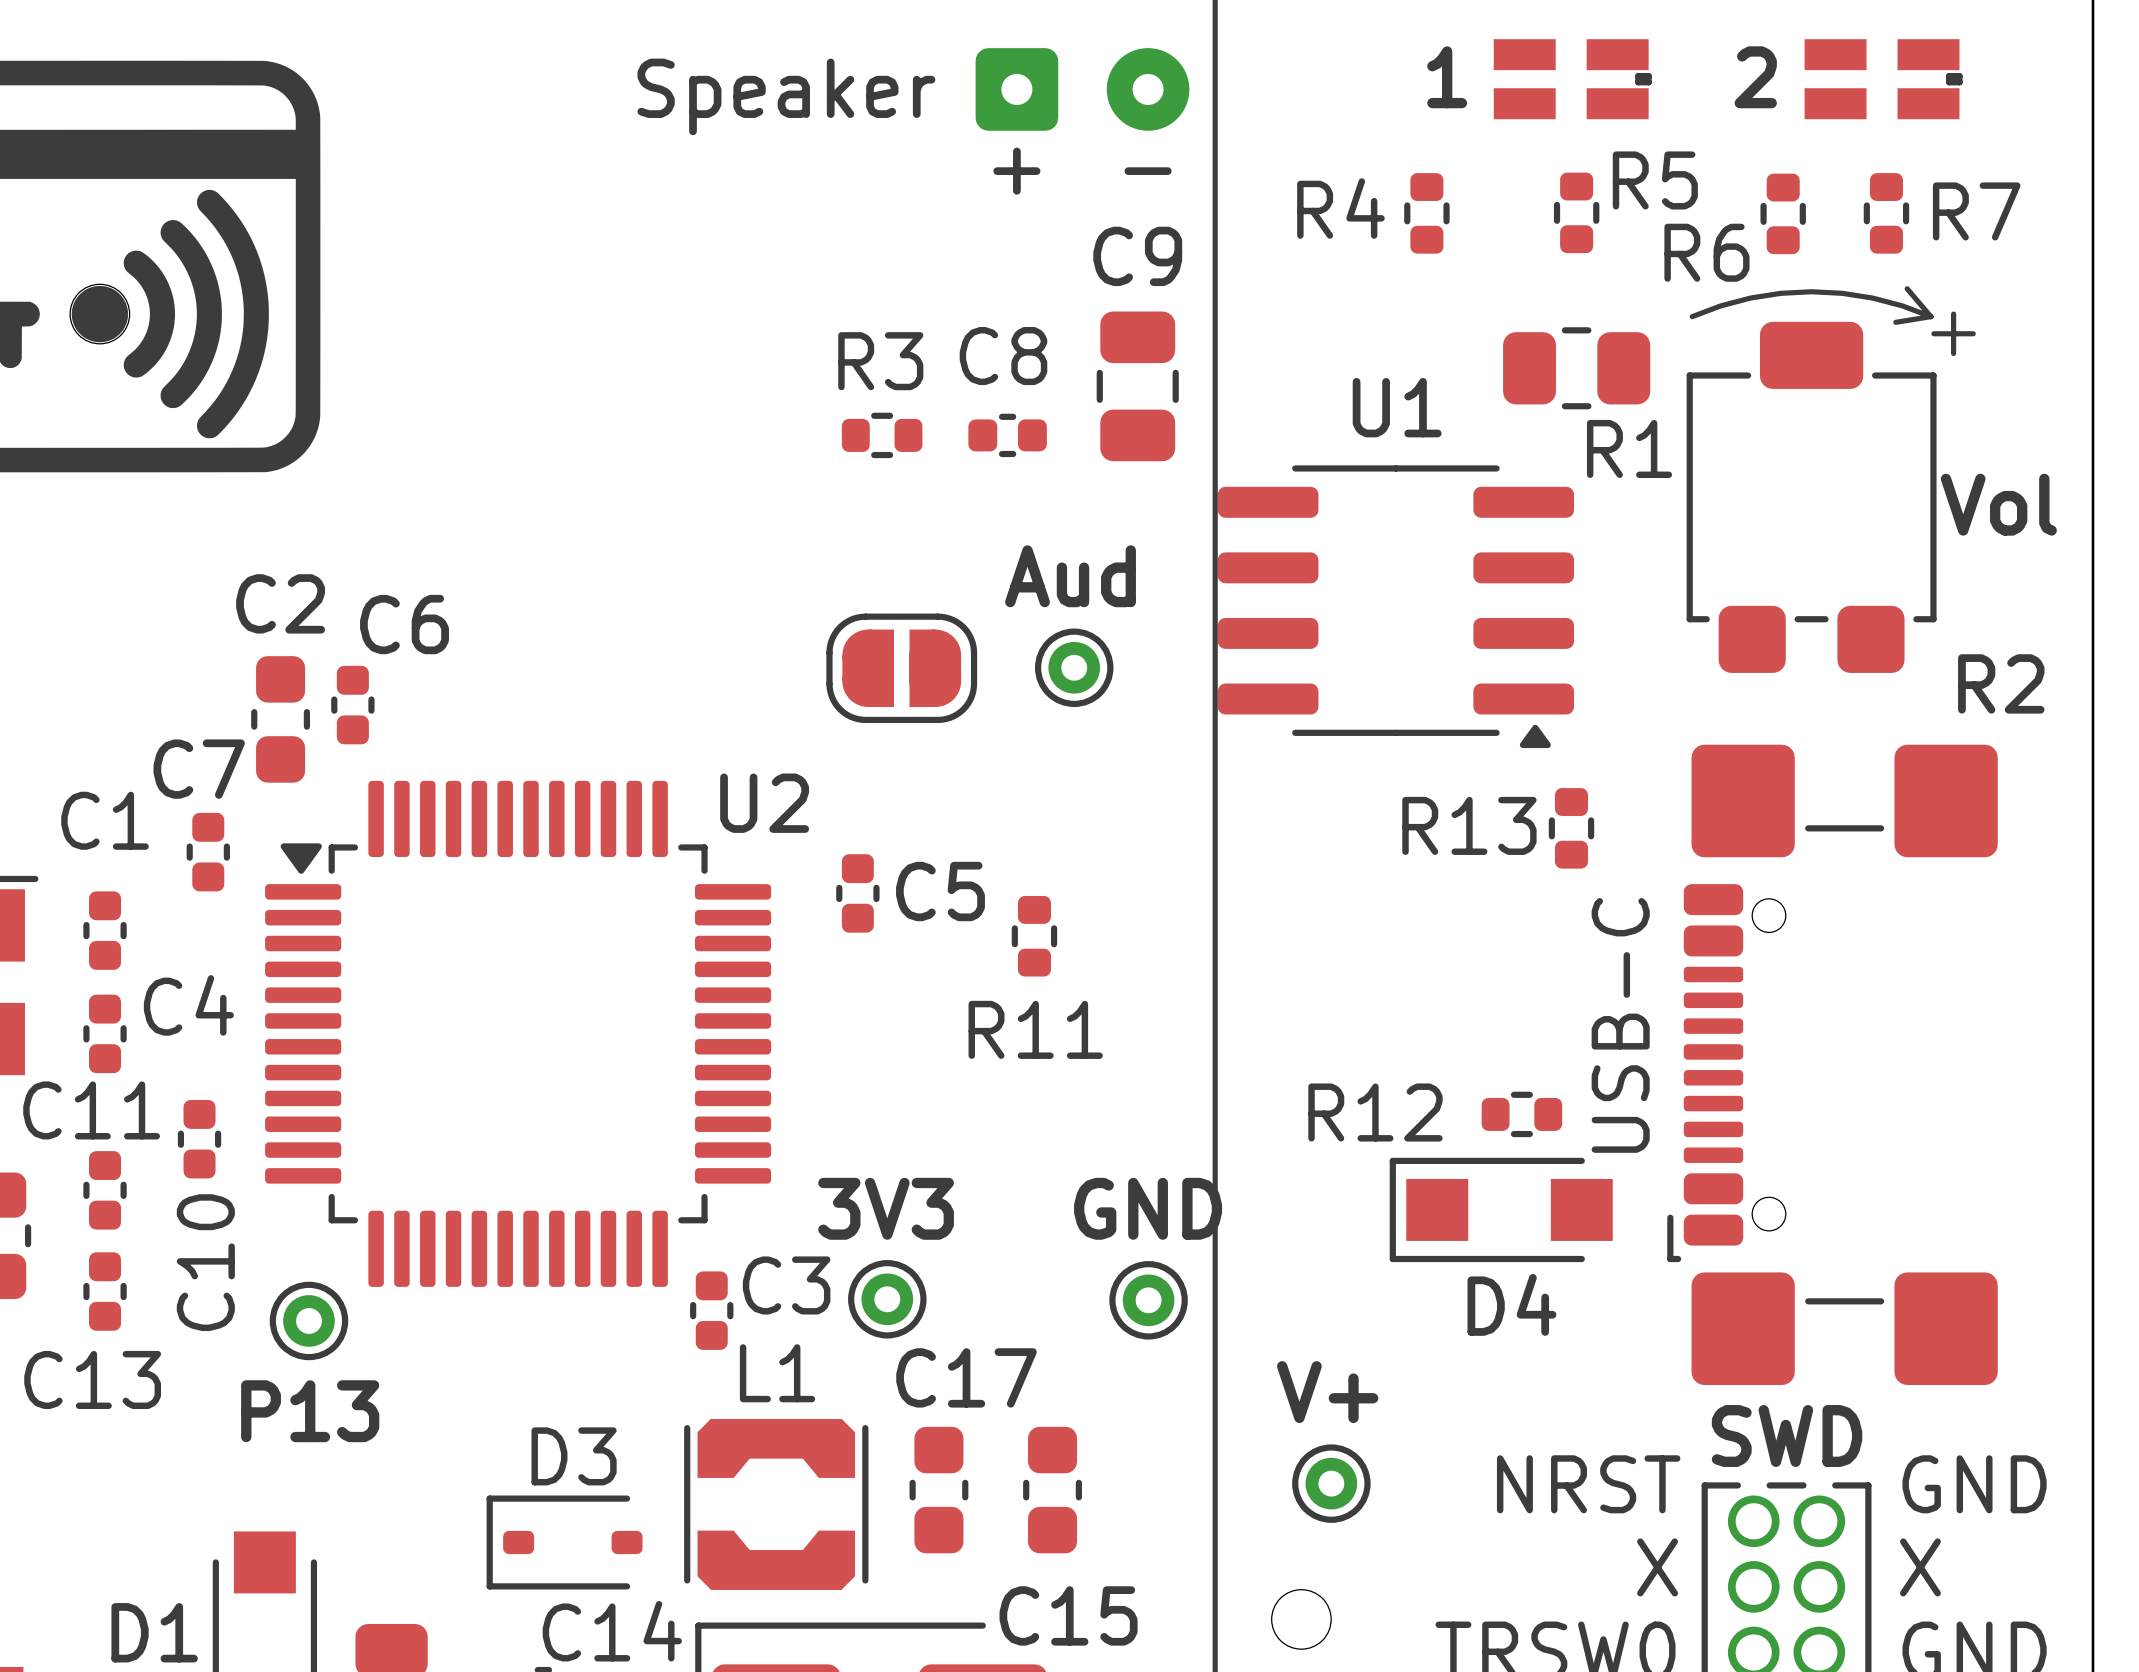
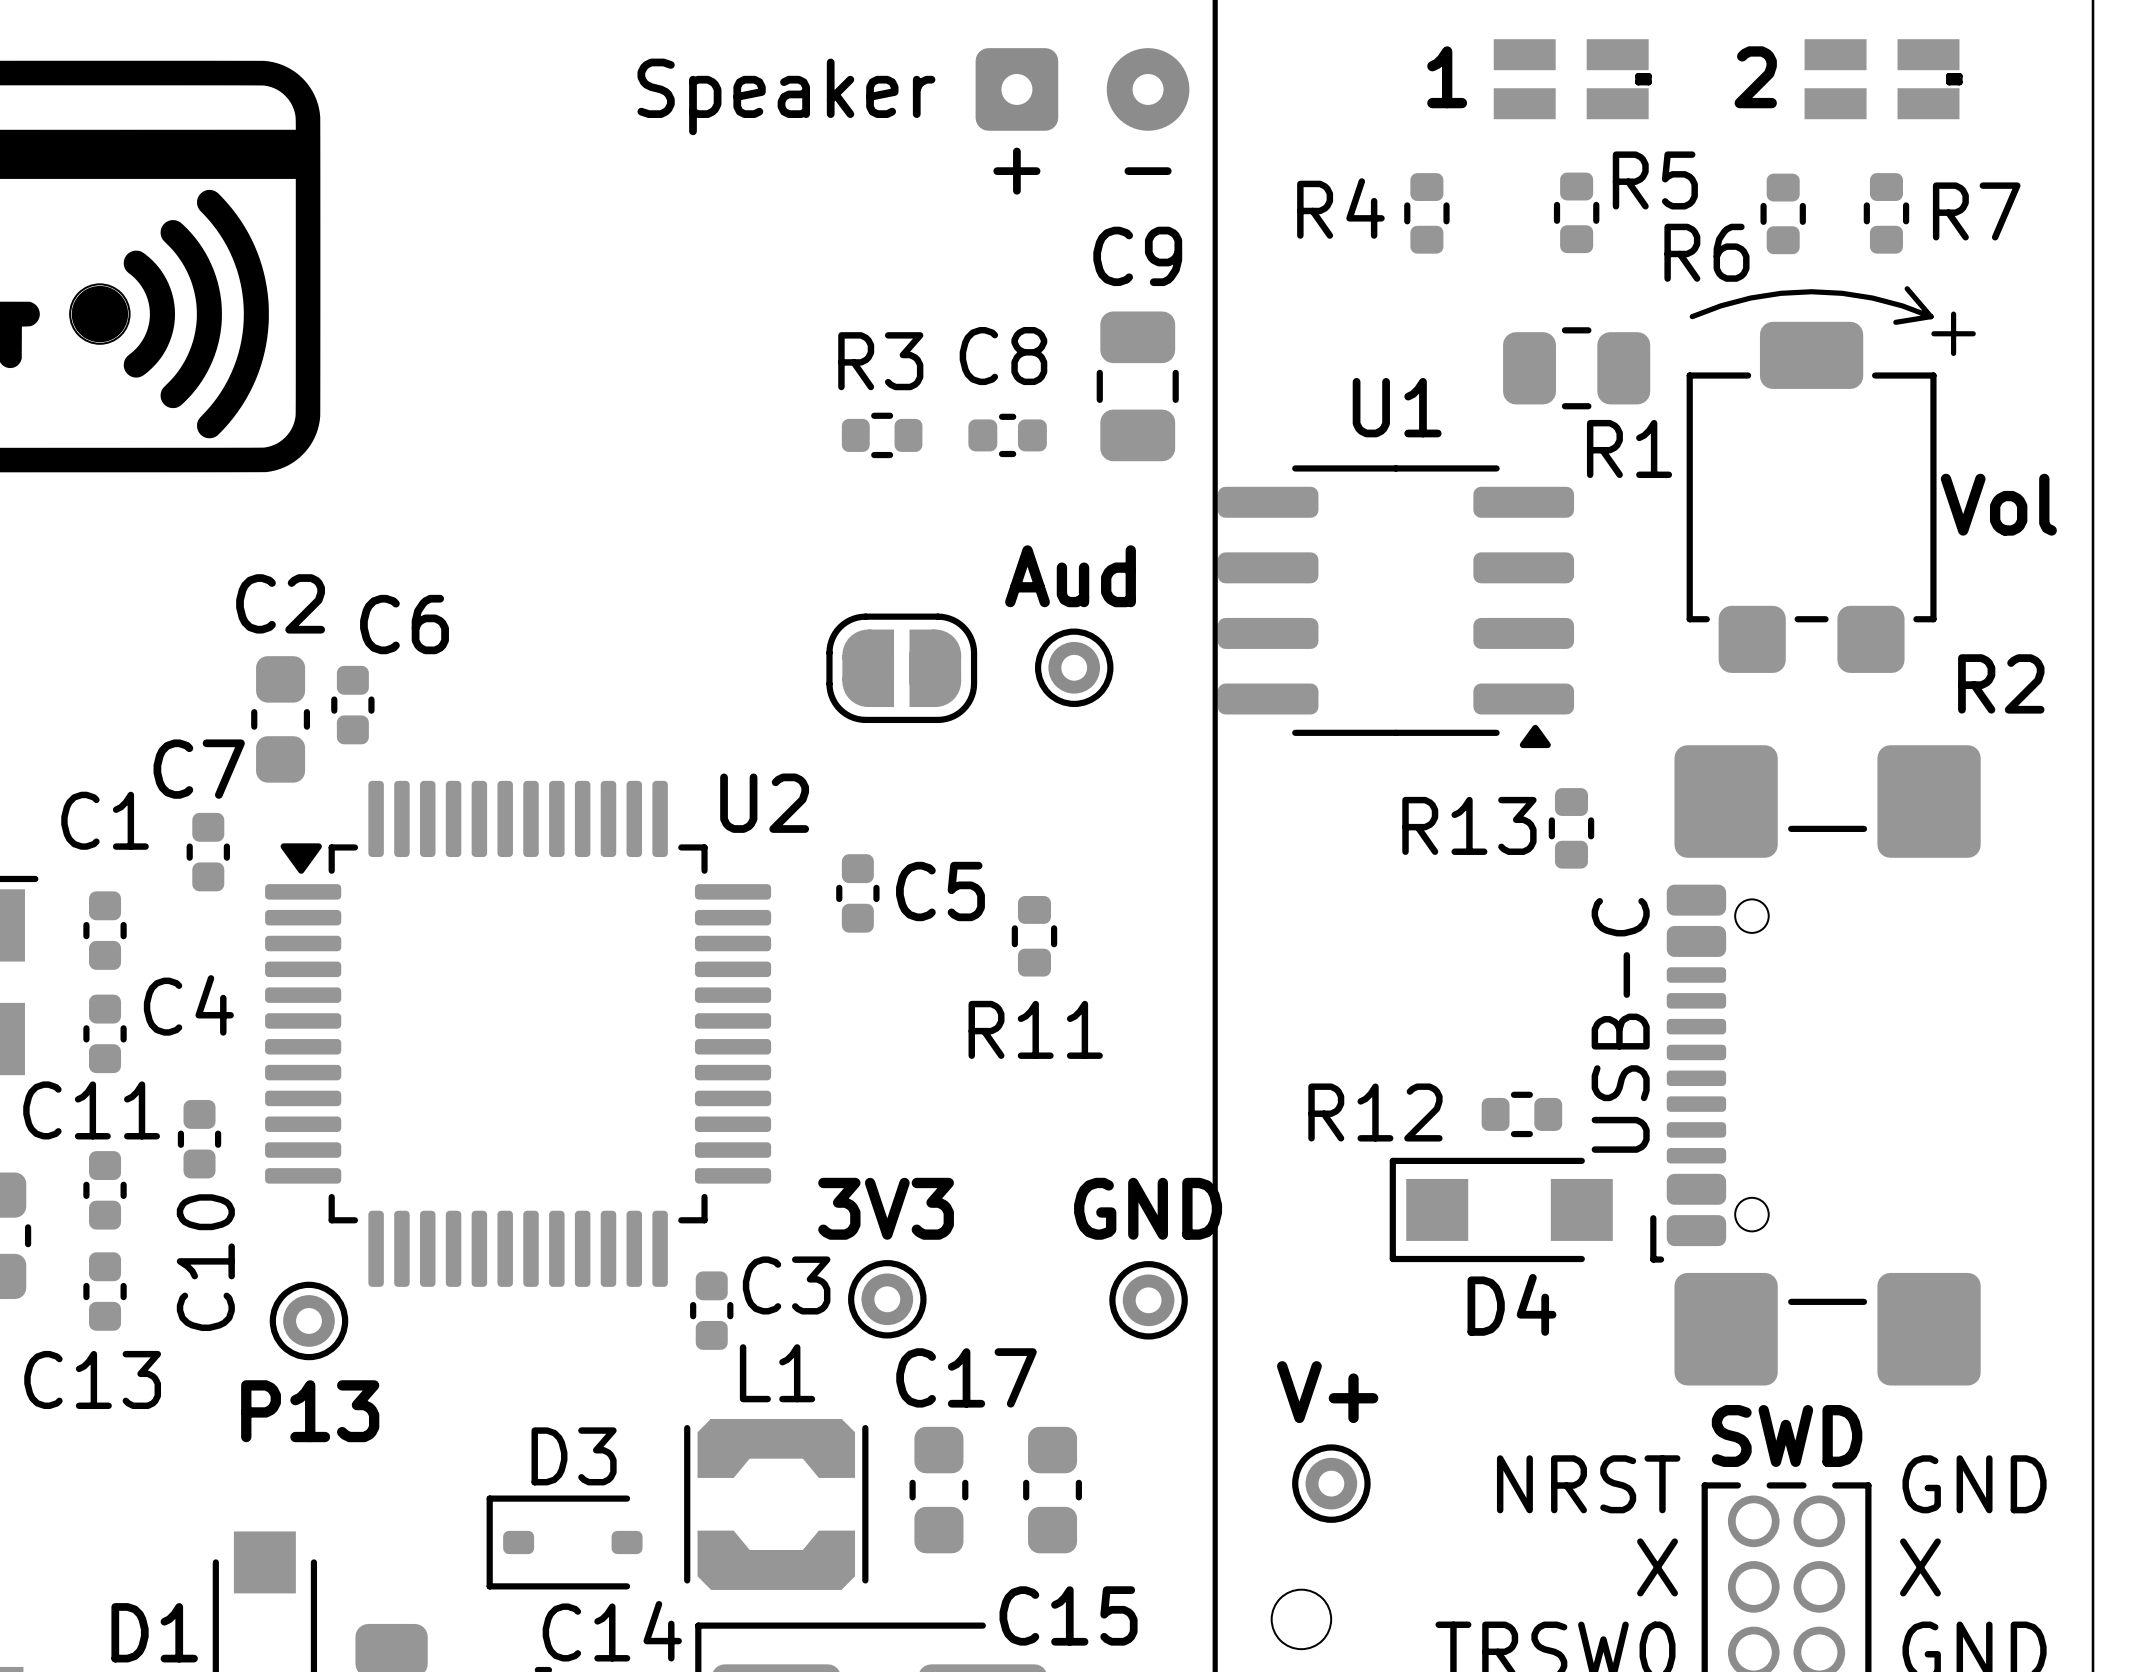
part position: (1832, 1064) -> (1815, 1065)

